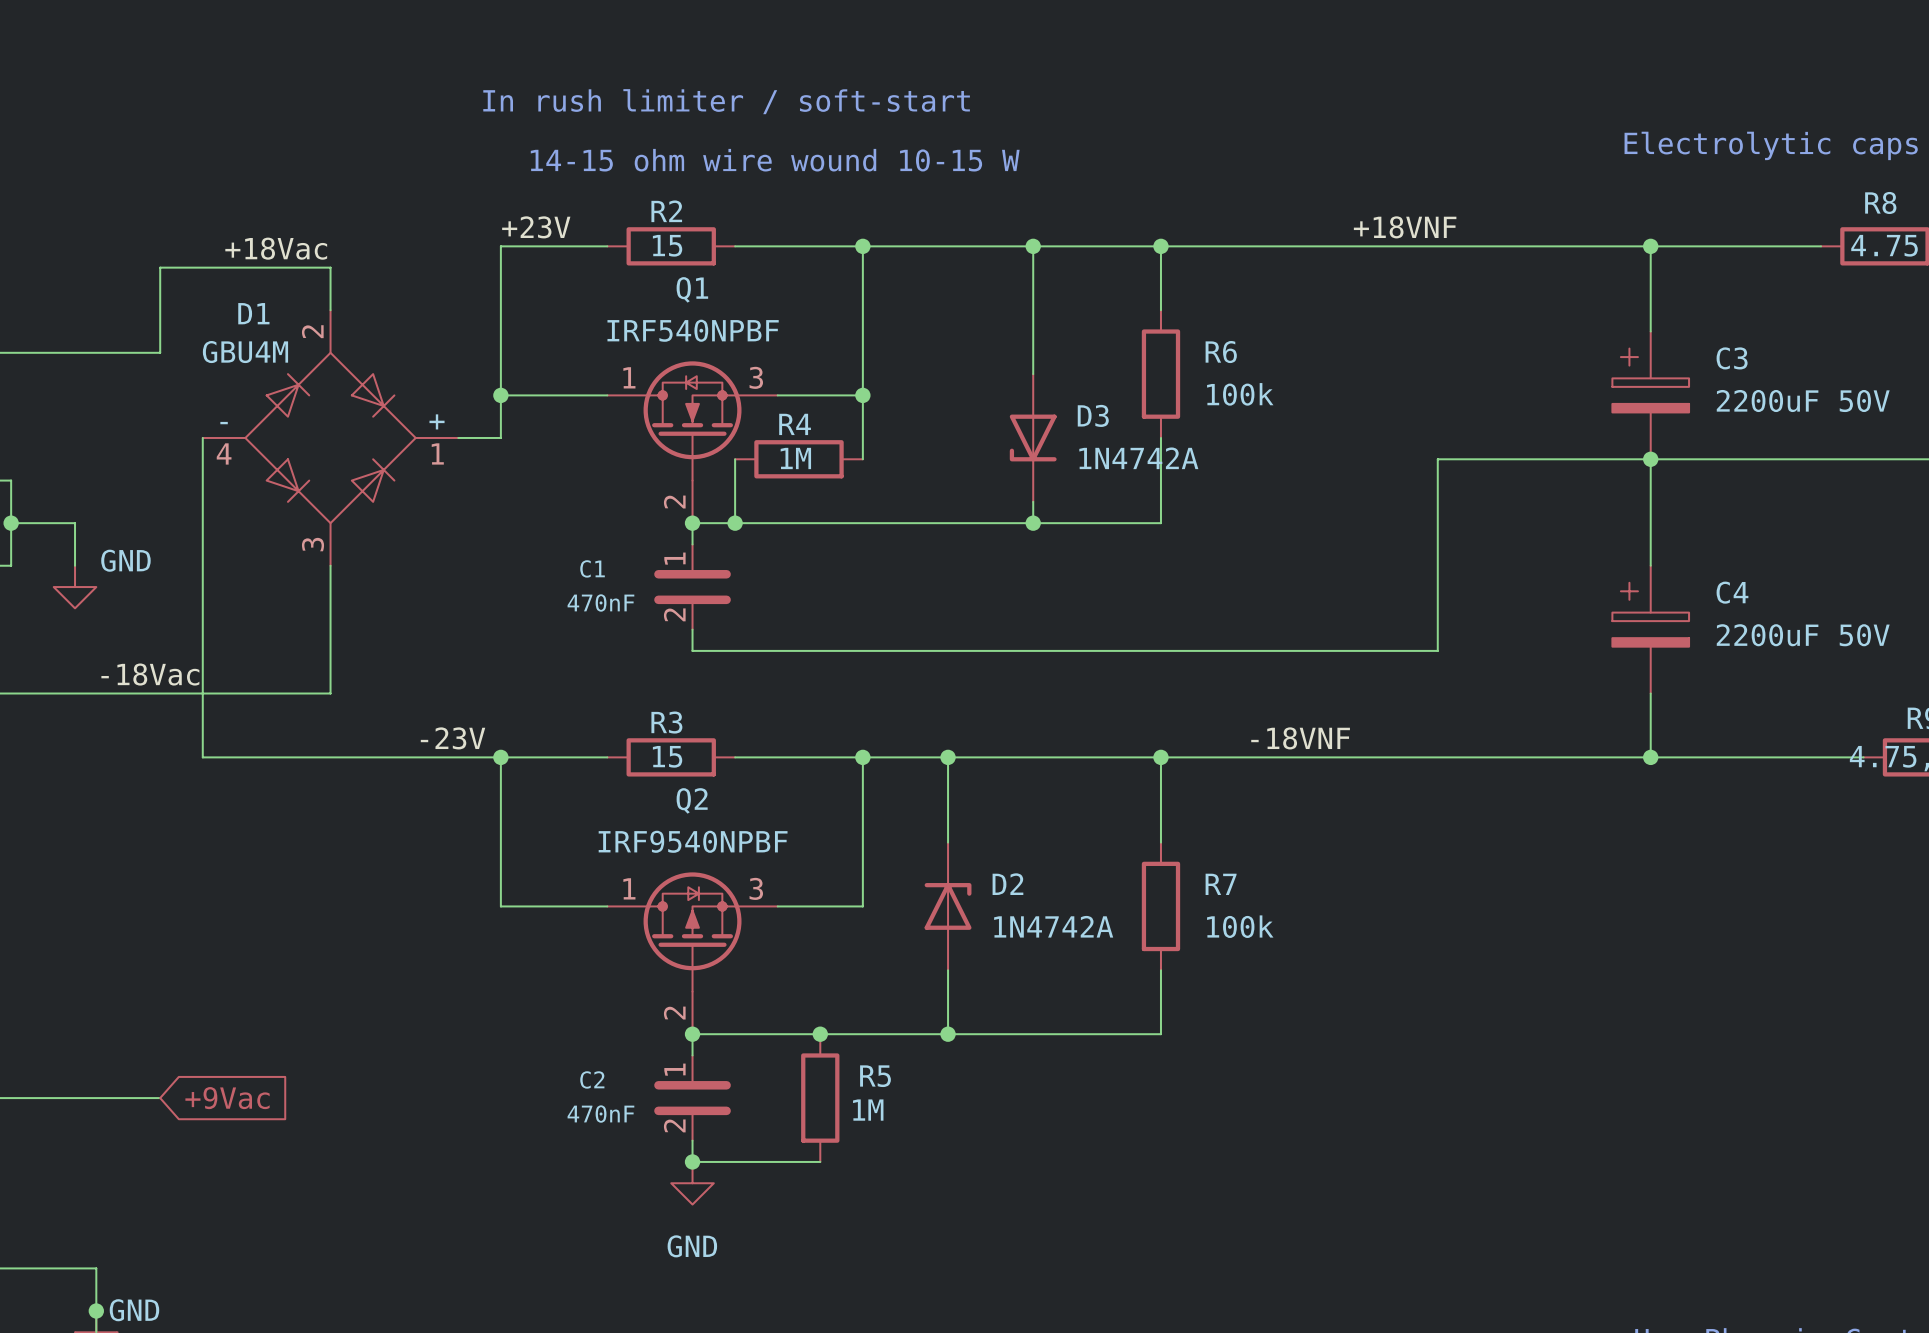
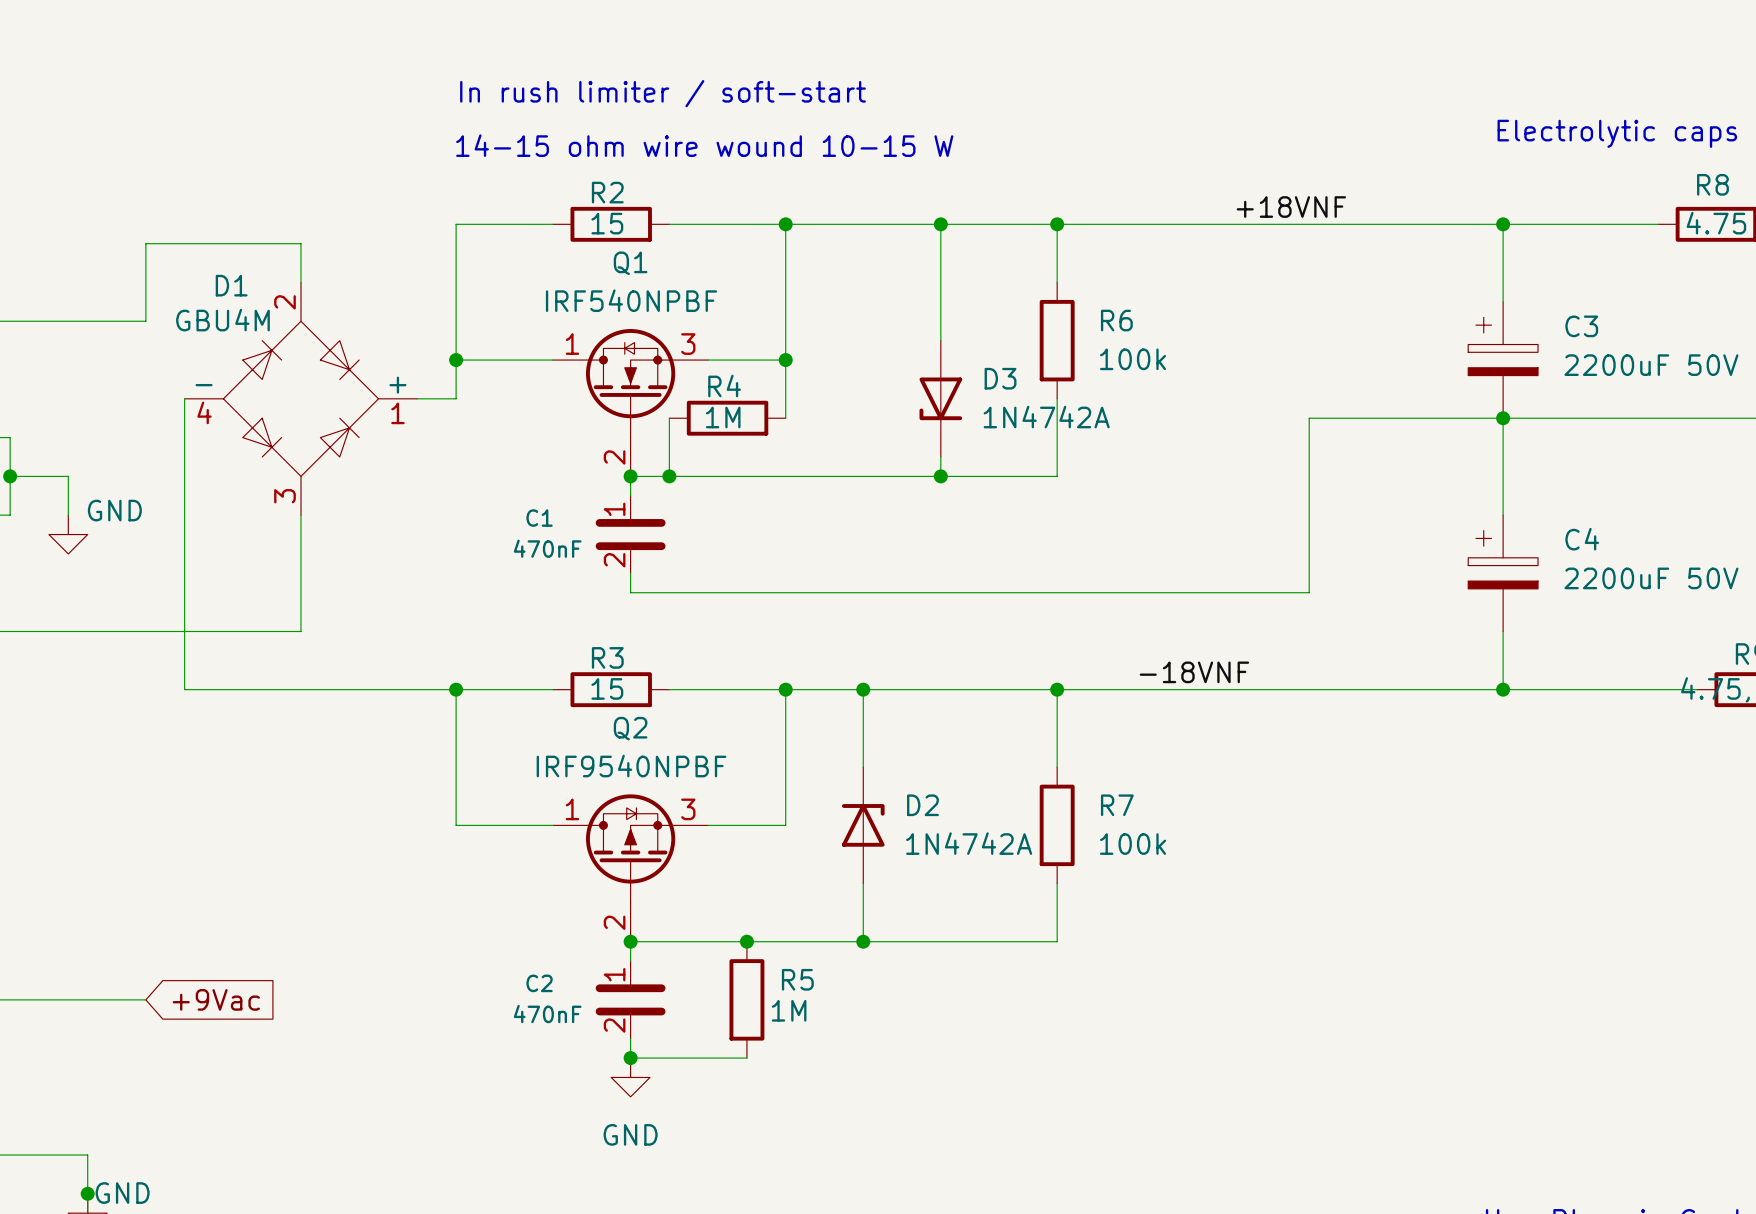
label: +23V (536, 227) -> none
label: +18Vac (276, 248) -> none
label: -18Vac (150, 674) -> none
label: -23V (453, 738) -> none

